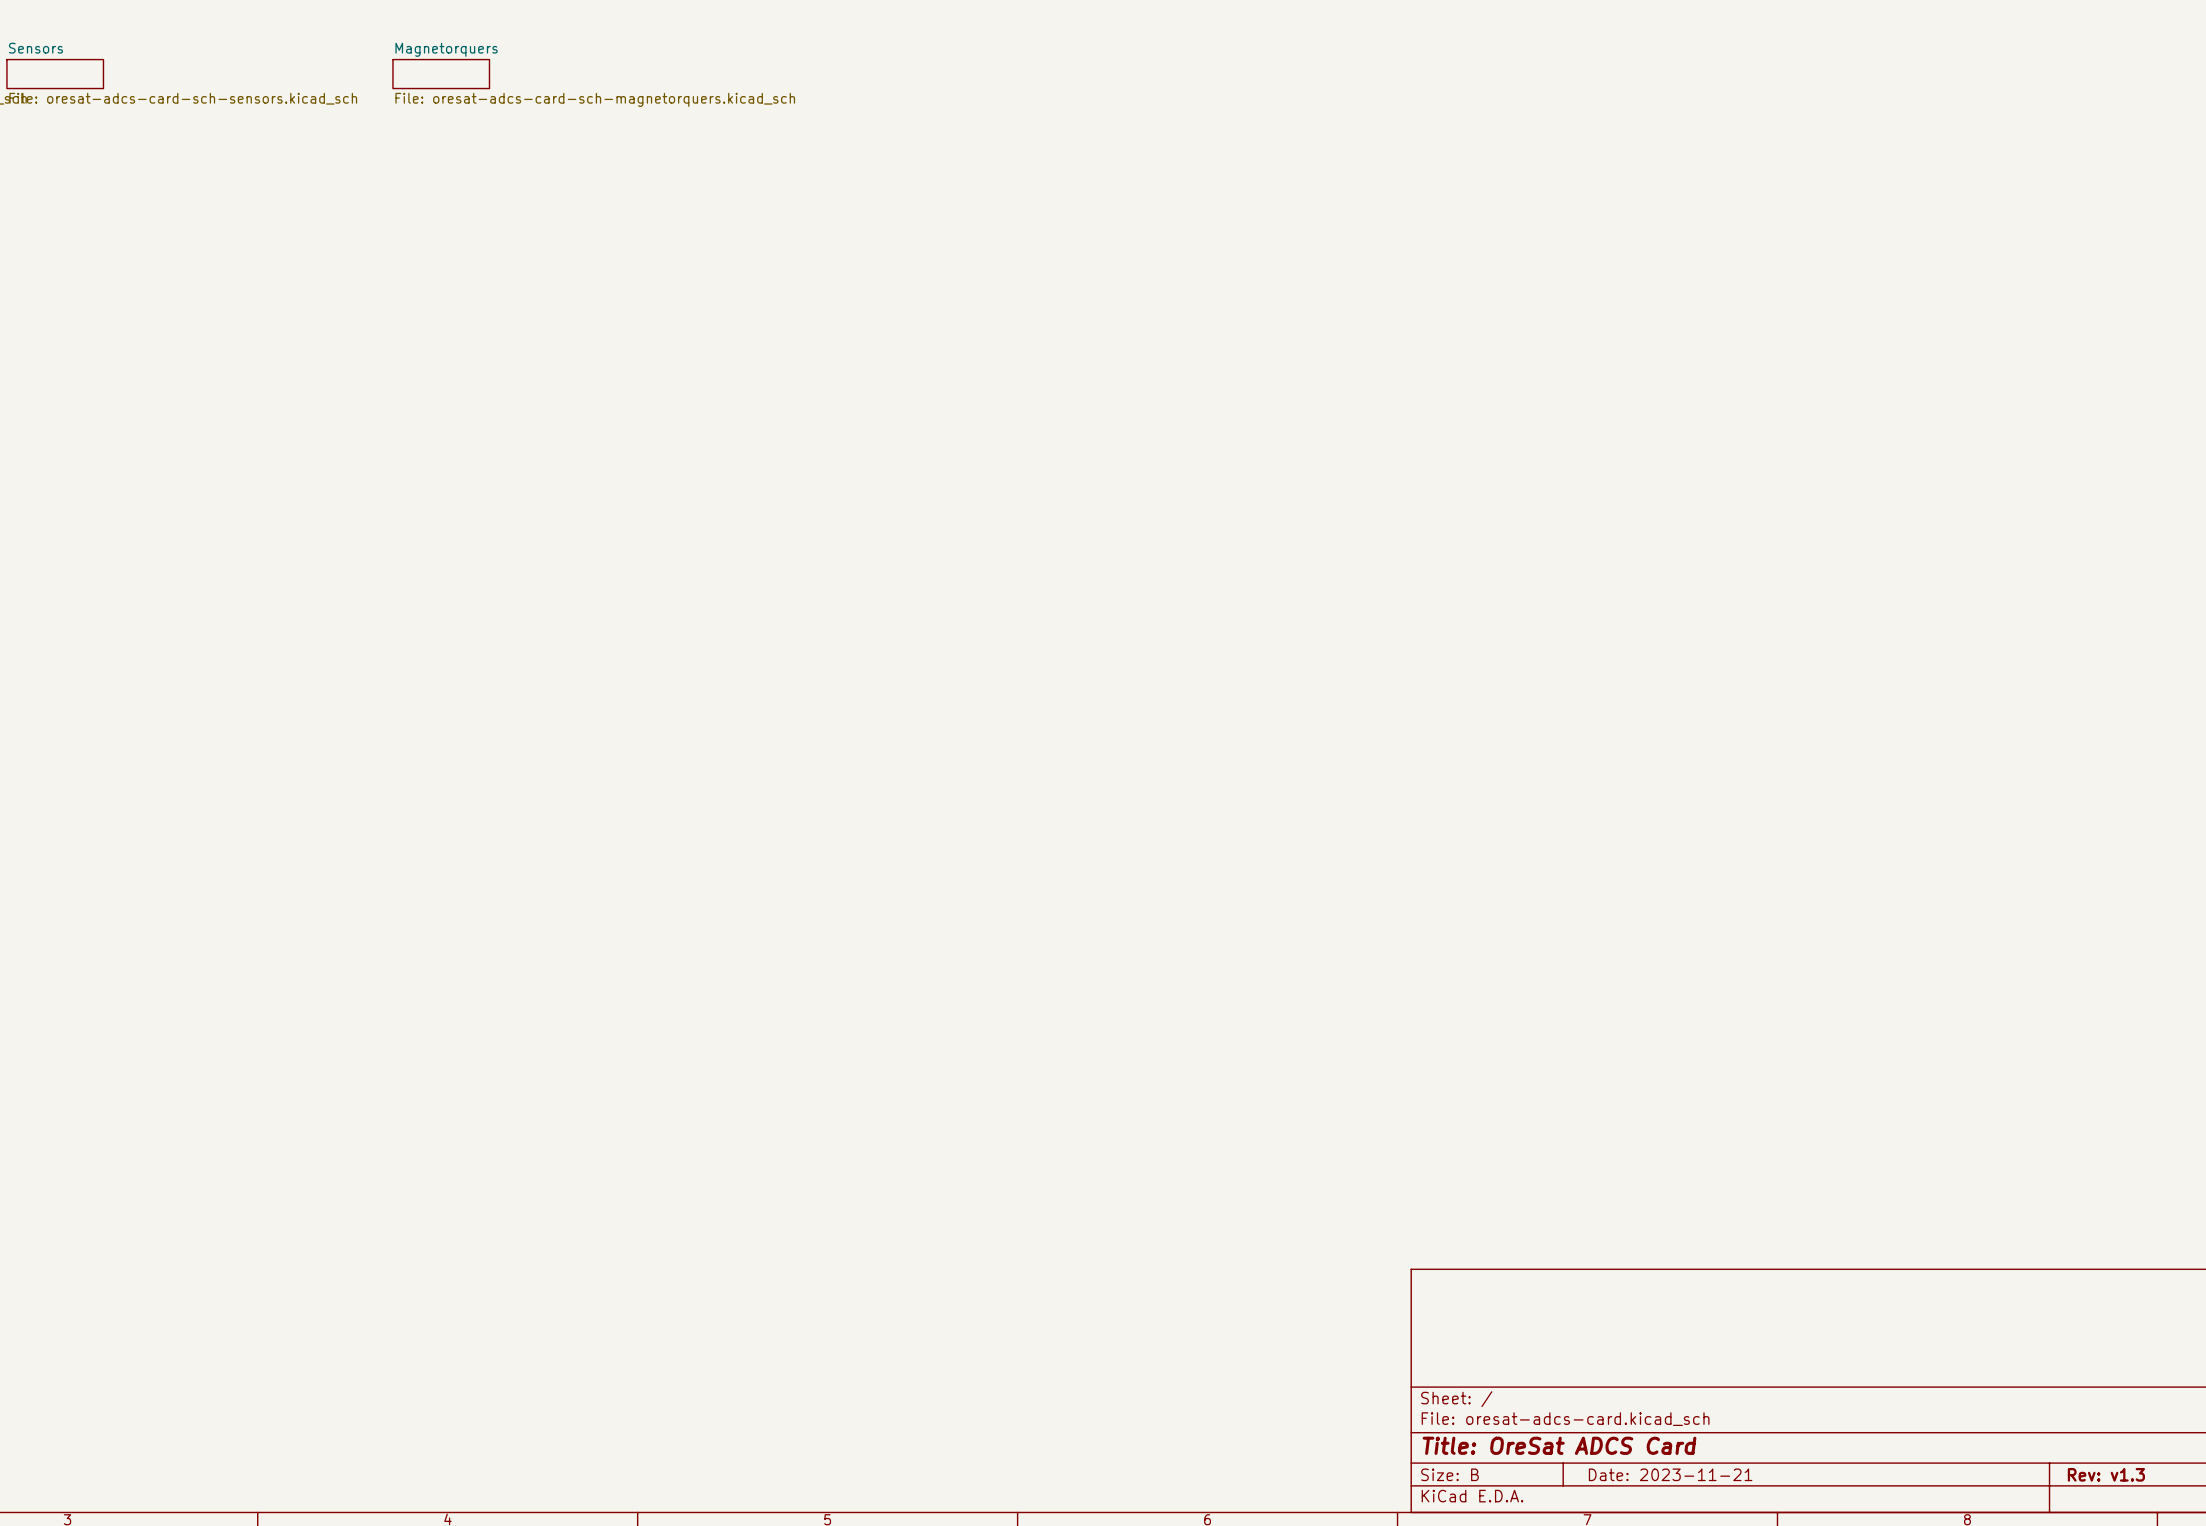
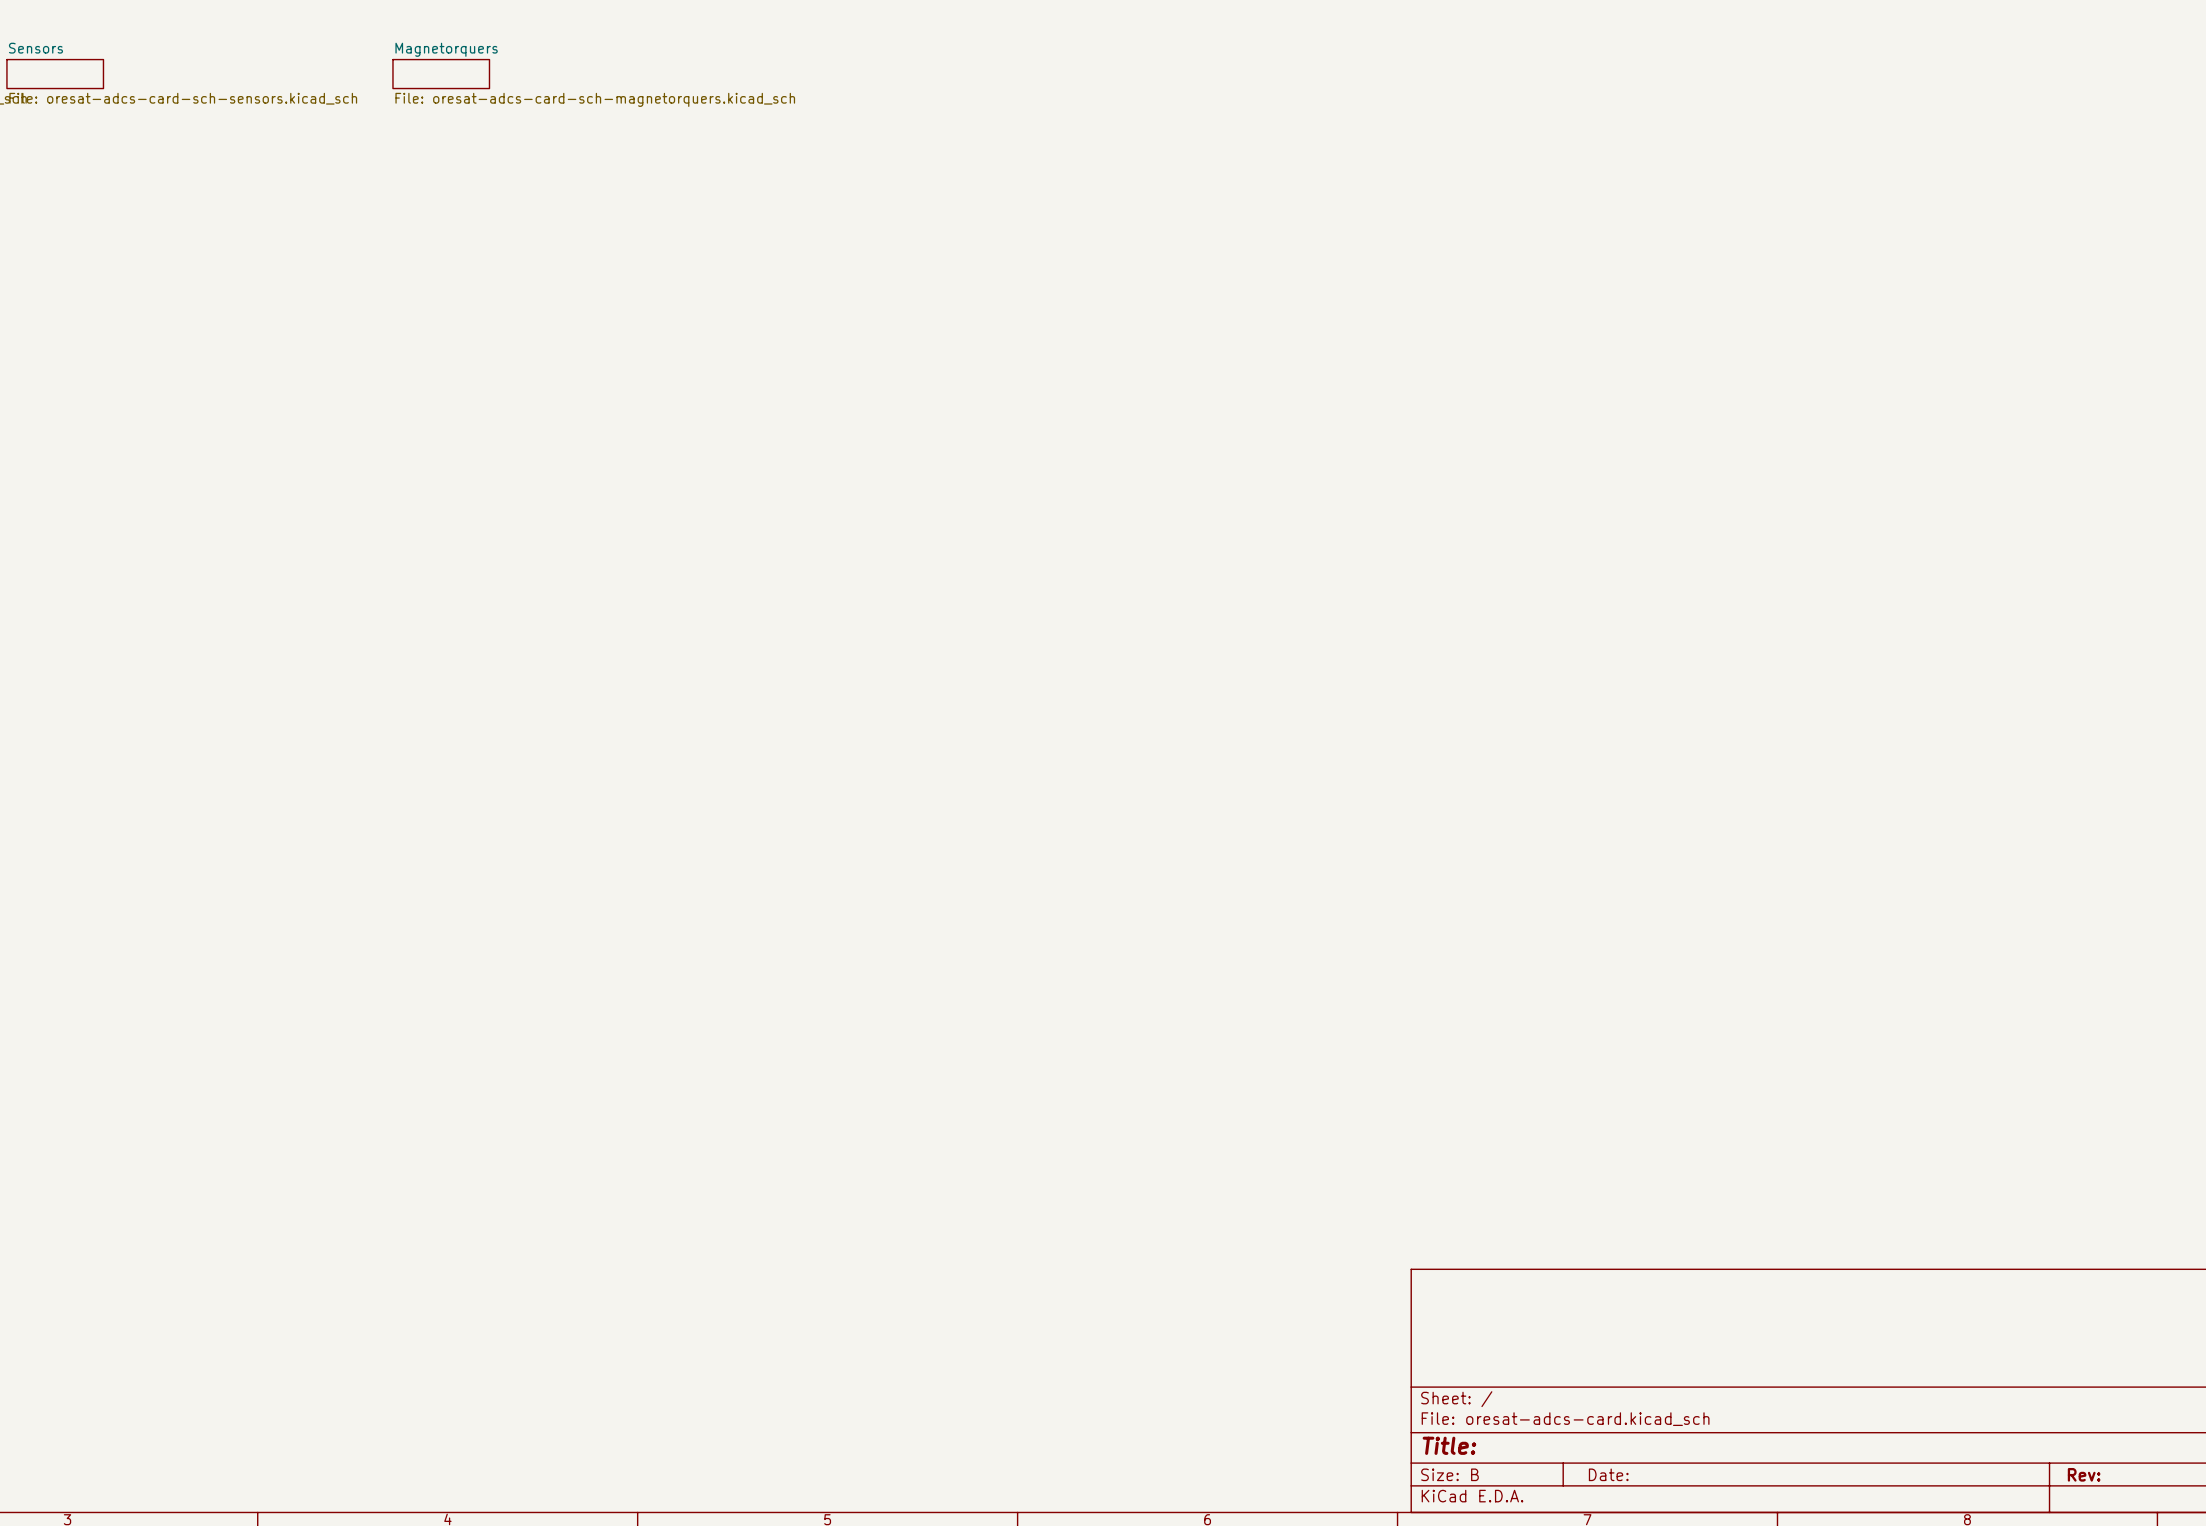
title block: Title: OreSat ADCS Card (1559, 1445) -> Title: (1449, 1445)
title block: Date: 2023-11-21 (1670, 1474) -> Date: (1608, 1474)
title block: Rev: v1.3 (2106, 1474) -> Rev: (2084, 1474)

